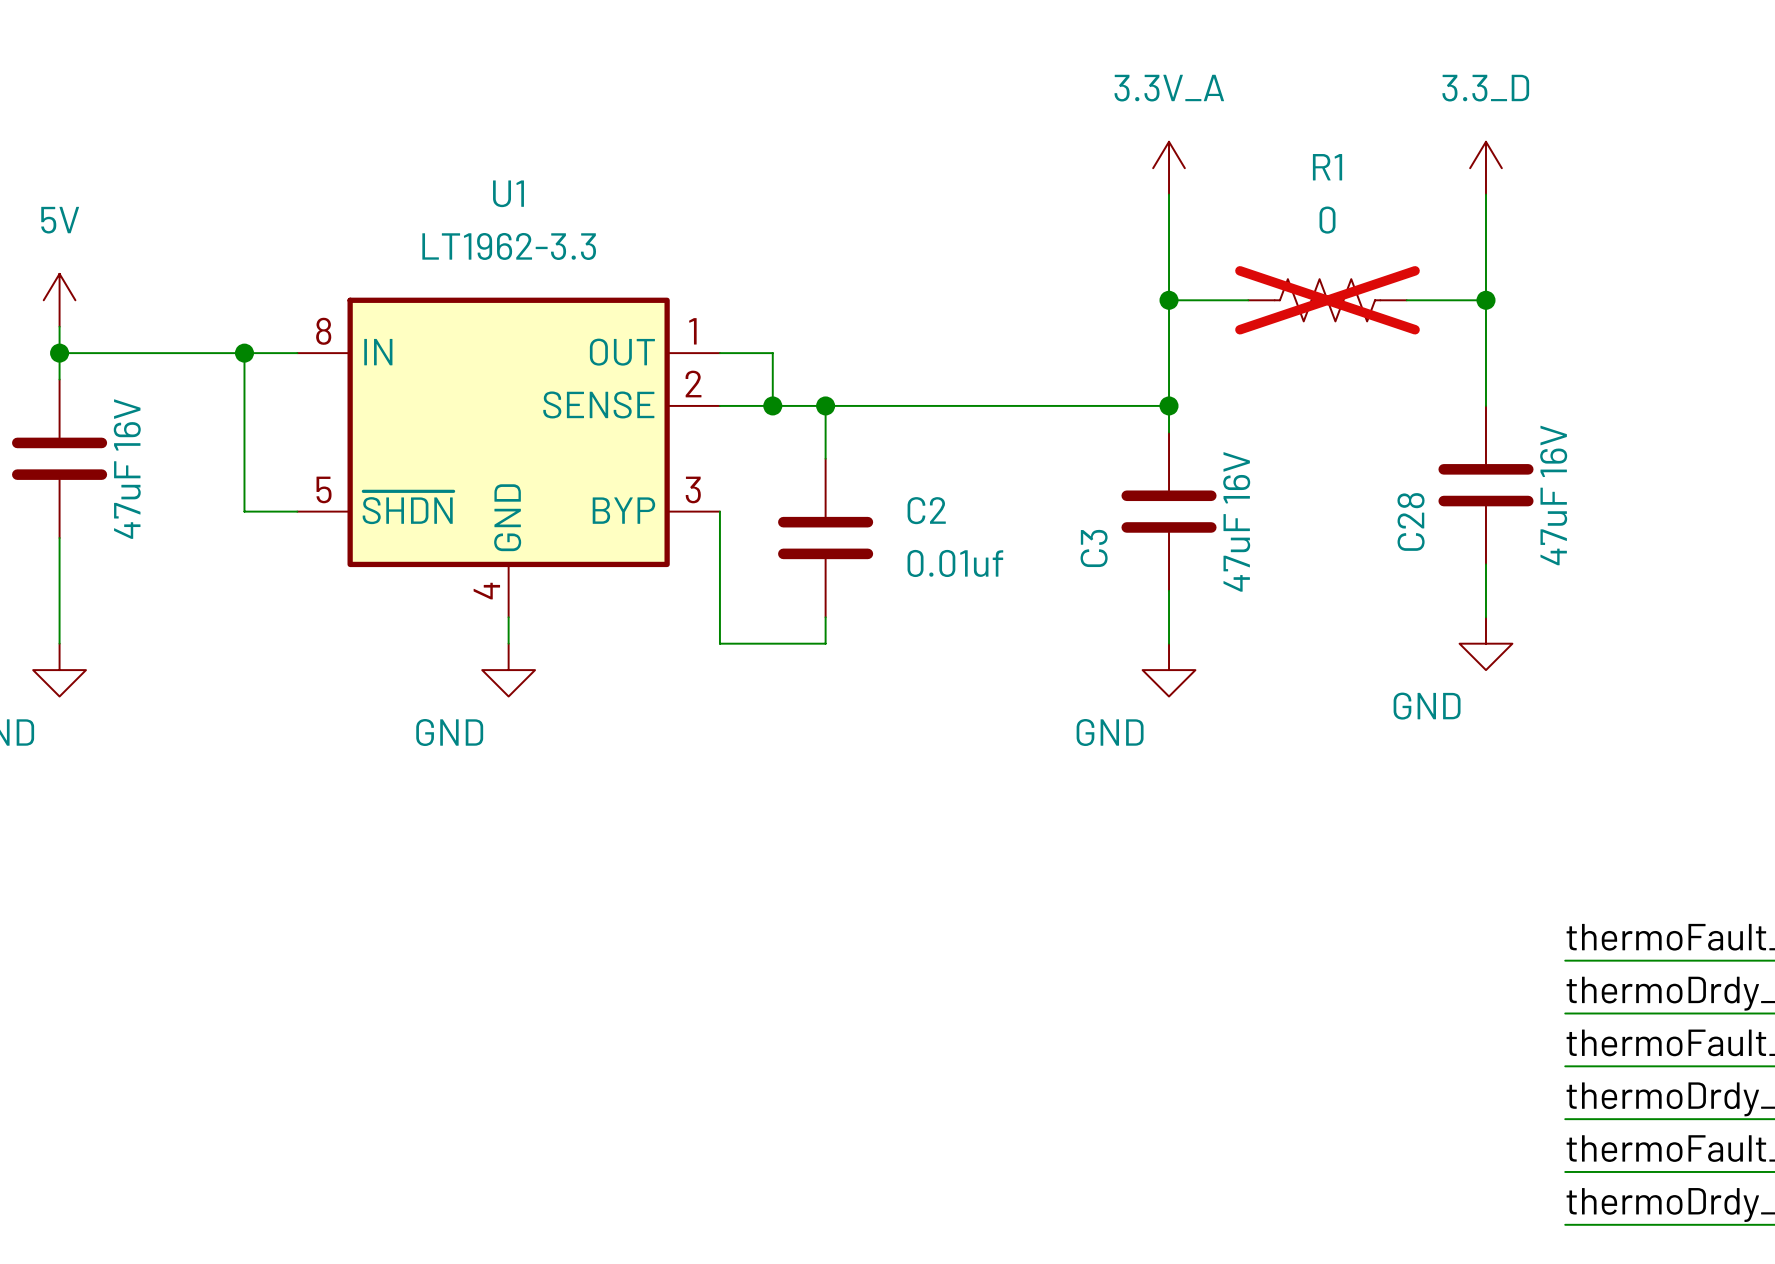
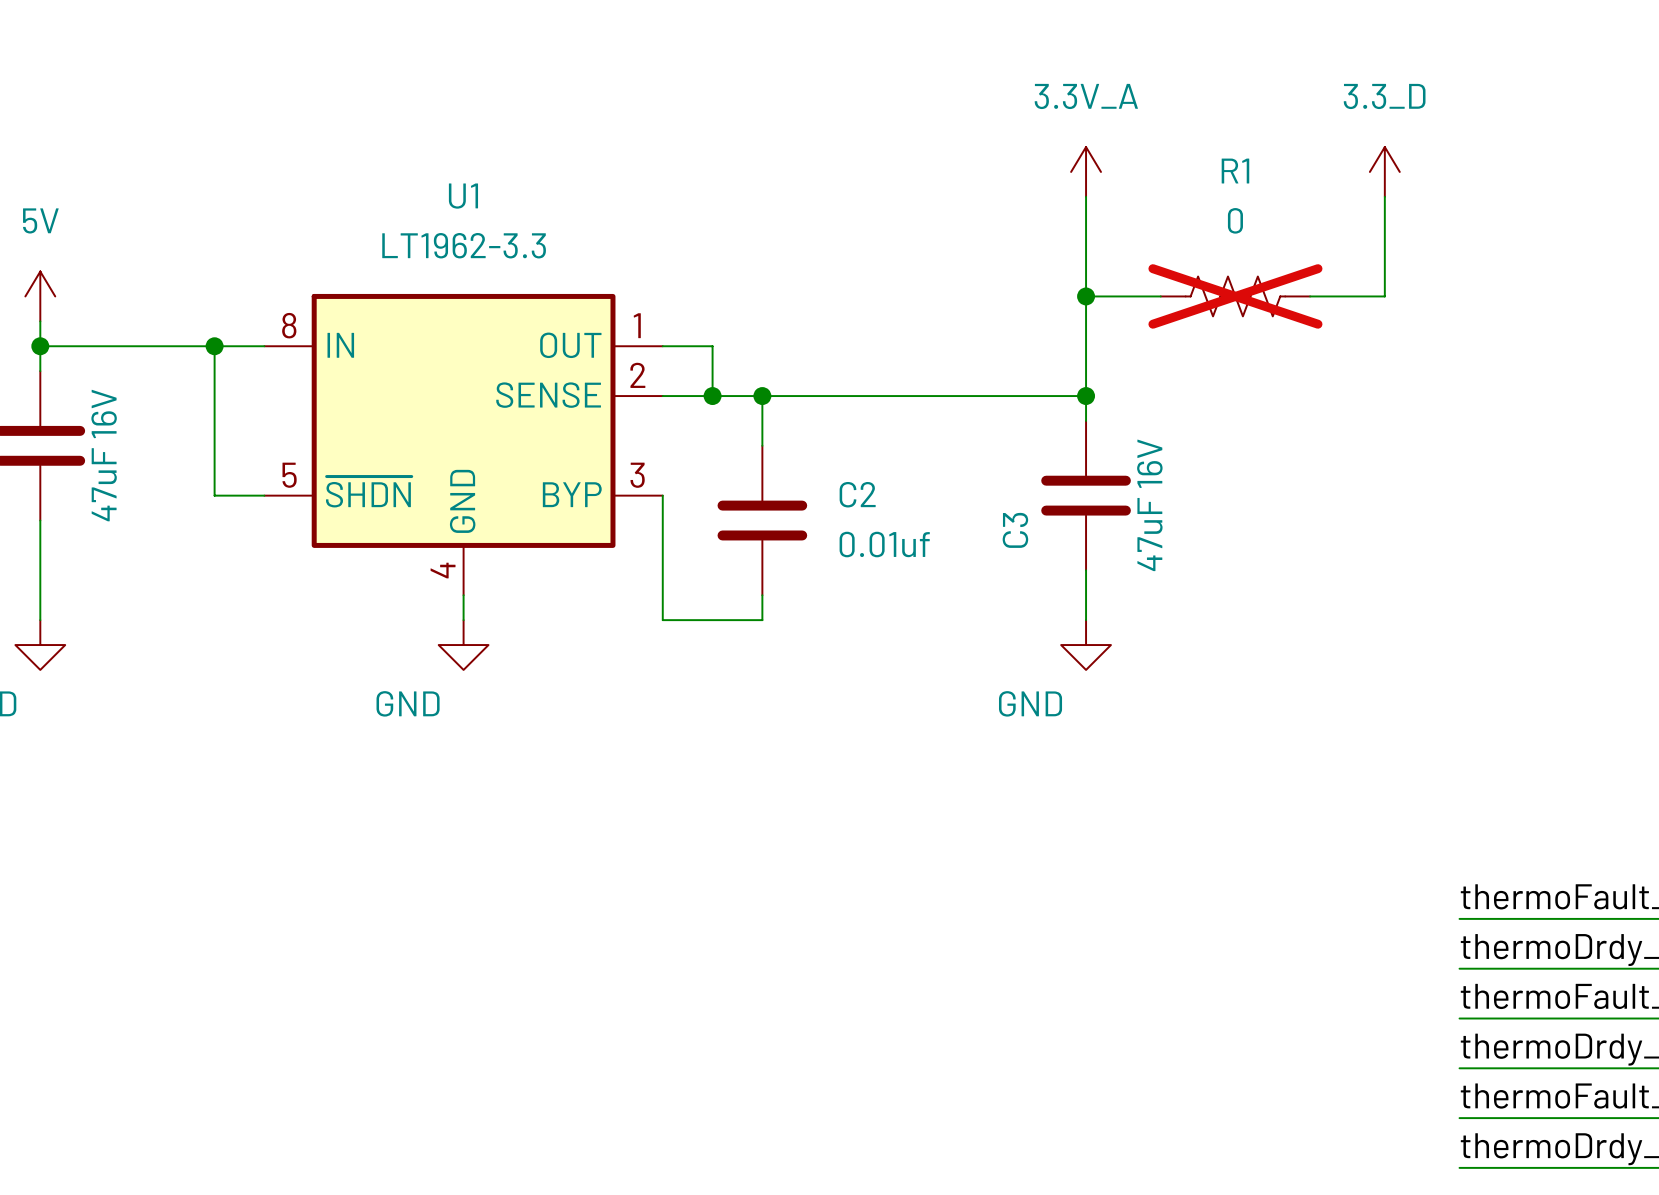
wire: (1485, 300) (1485, 405) -> none
junction: (1485, 300) -> none
C28: 47uF 16V (1485, 485) -> none
wire: (1485, 564) (1485, 617) -> none
power symbol: GND (1485, 643) -> none

